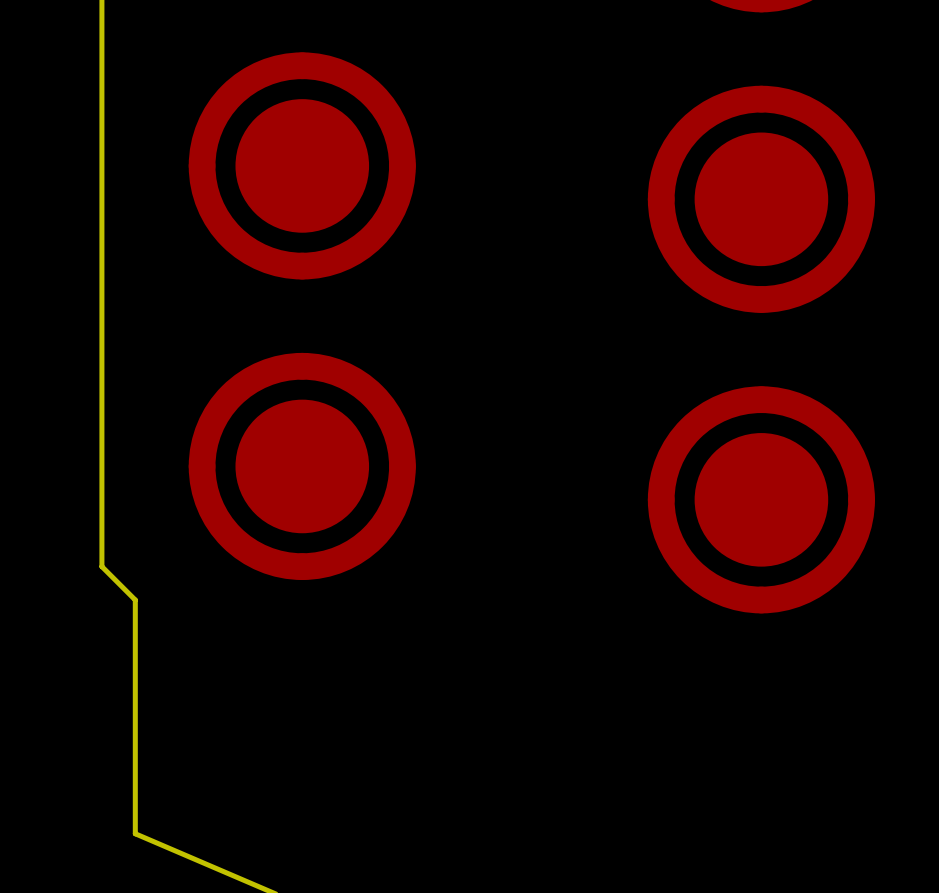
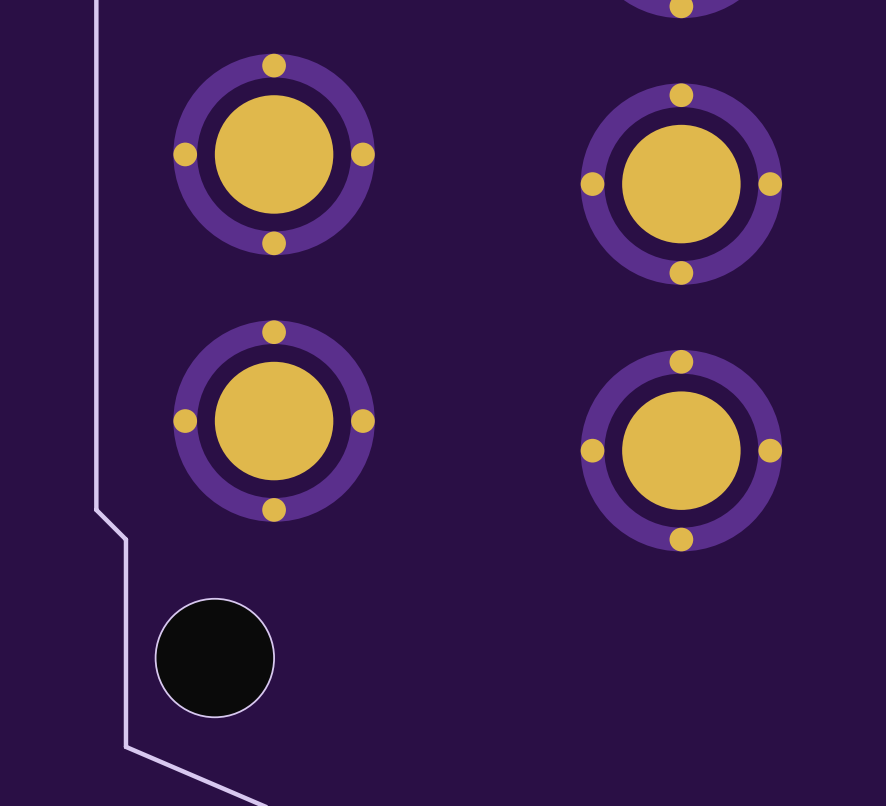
part: none -> (214, 658)

